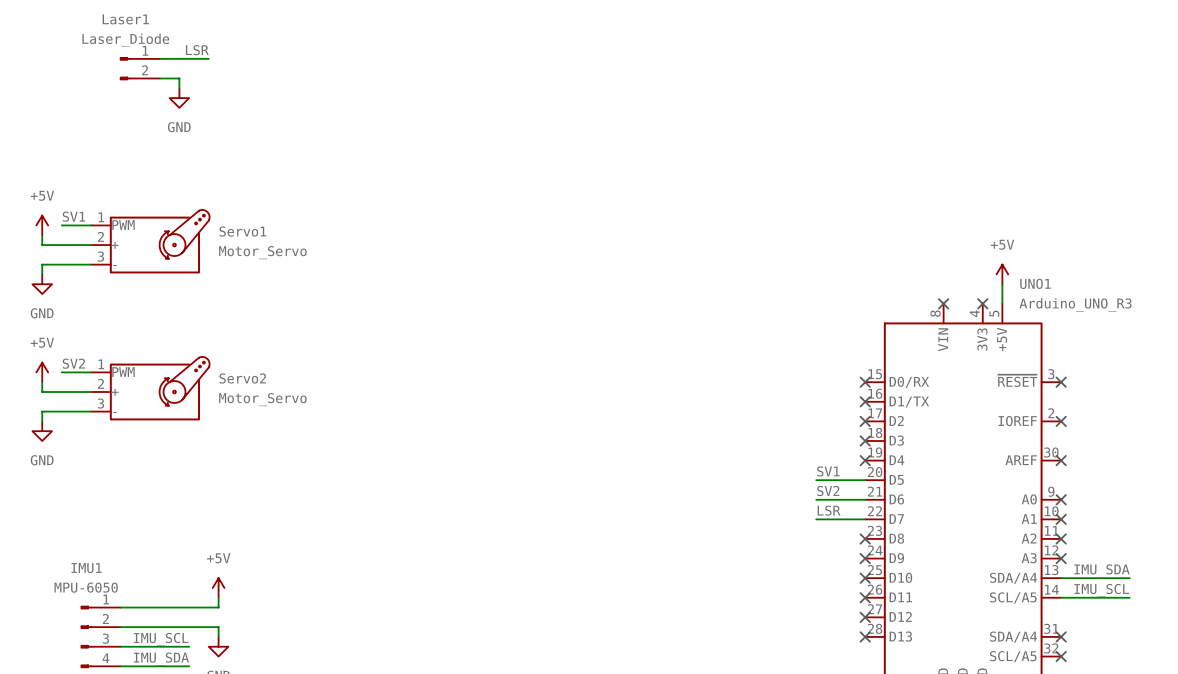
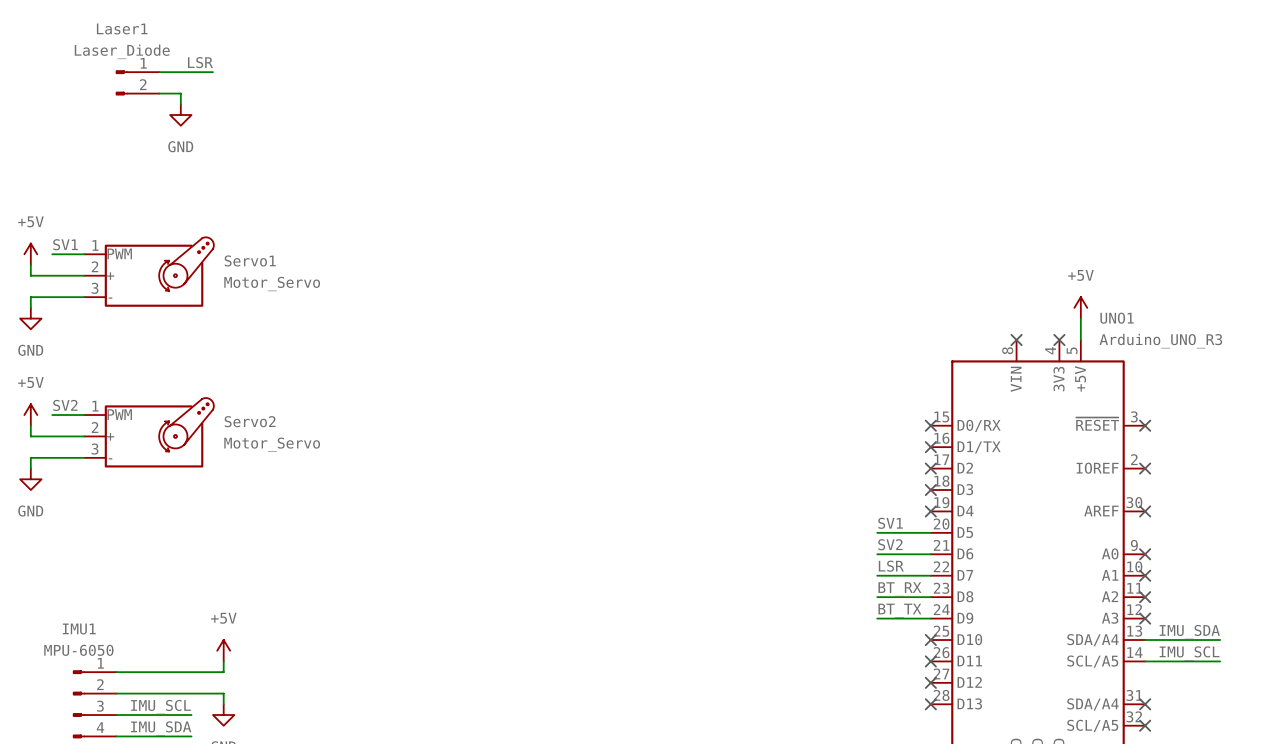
label: none -> BT_RX (899, 589)
wire: none -> (877, 597) (930, 597)
no-connect mark: (865, 538) -> none
label: none -> BT_TX (899, 610)
wire: none -> (877, 618) (930, 618)
no-connect mark: (865, 558) -> none

